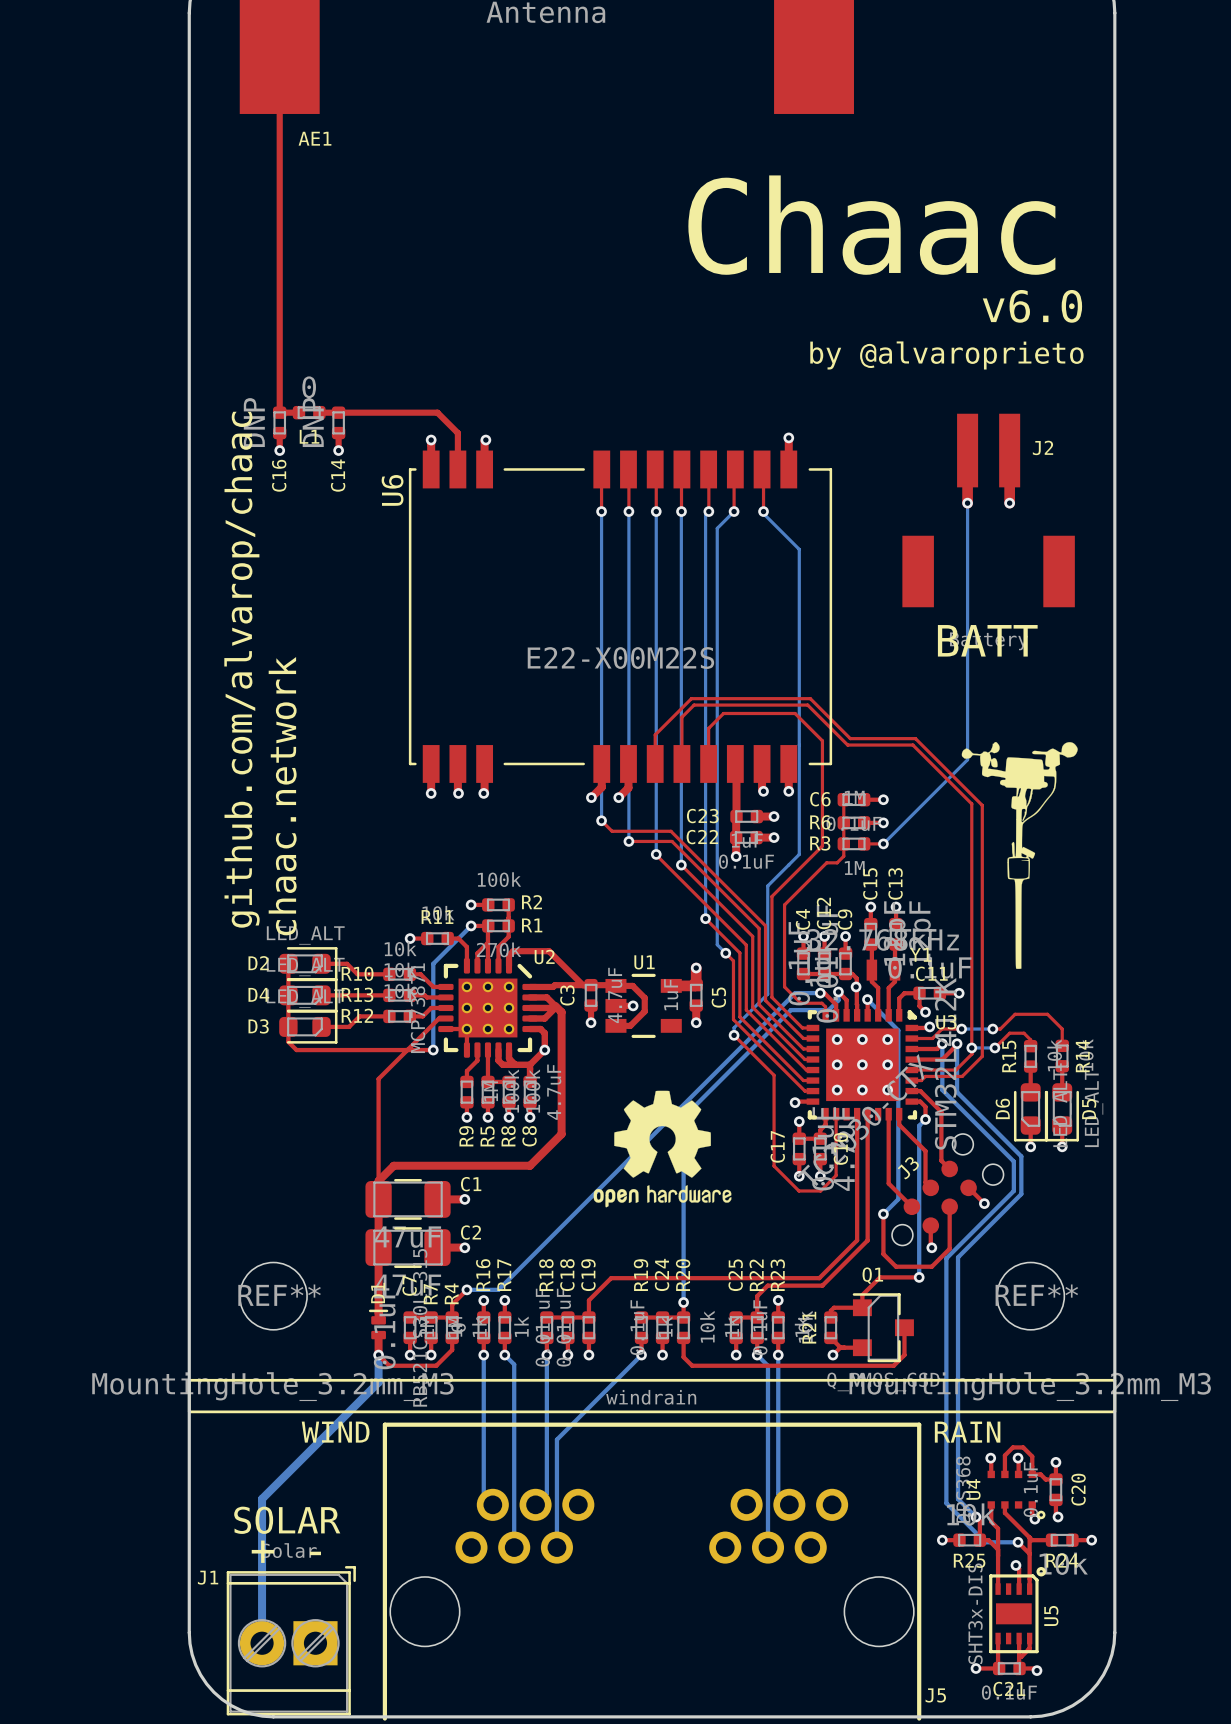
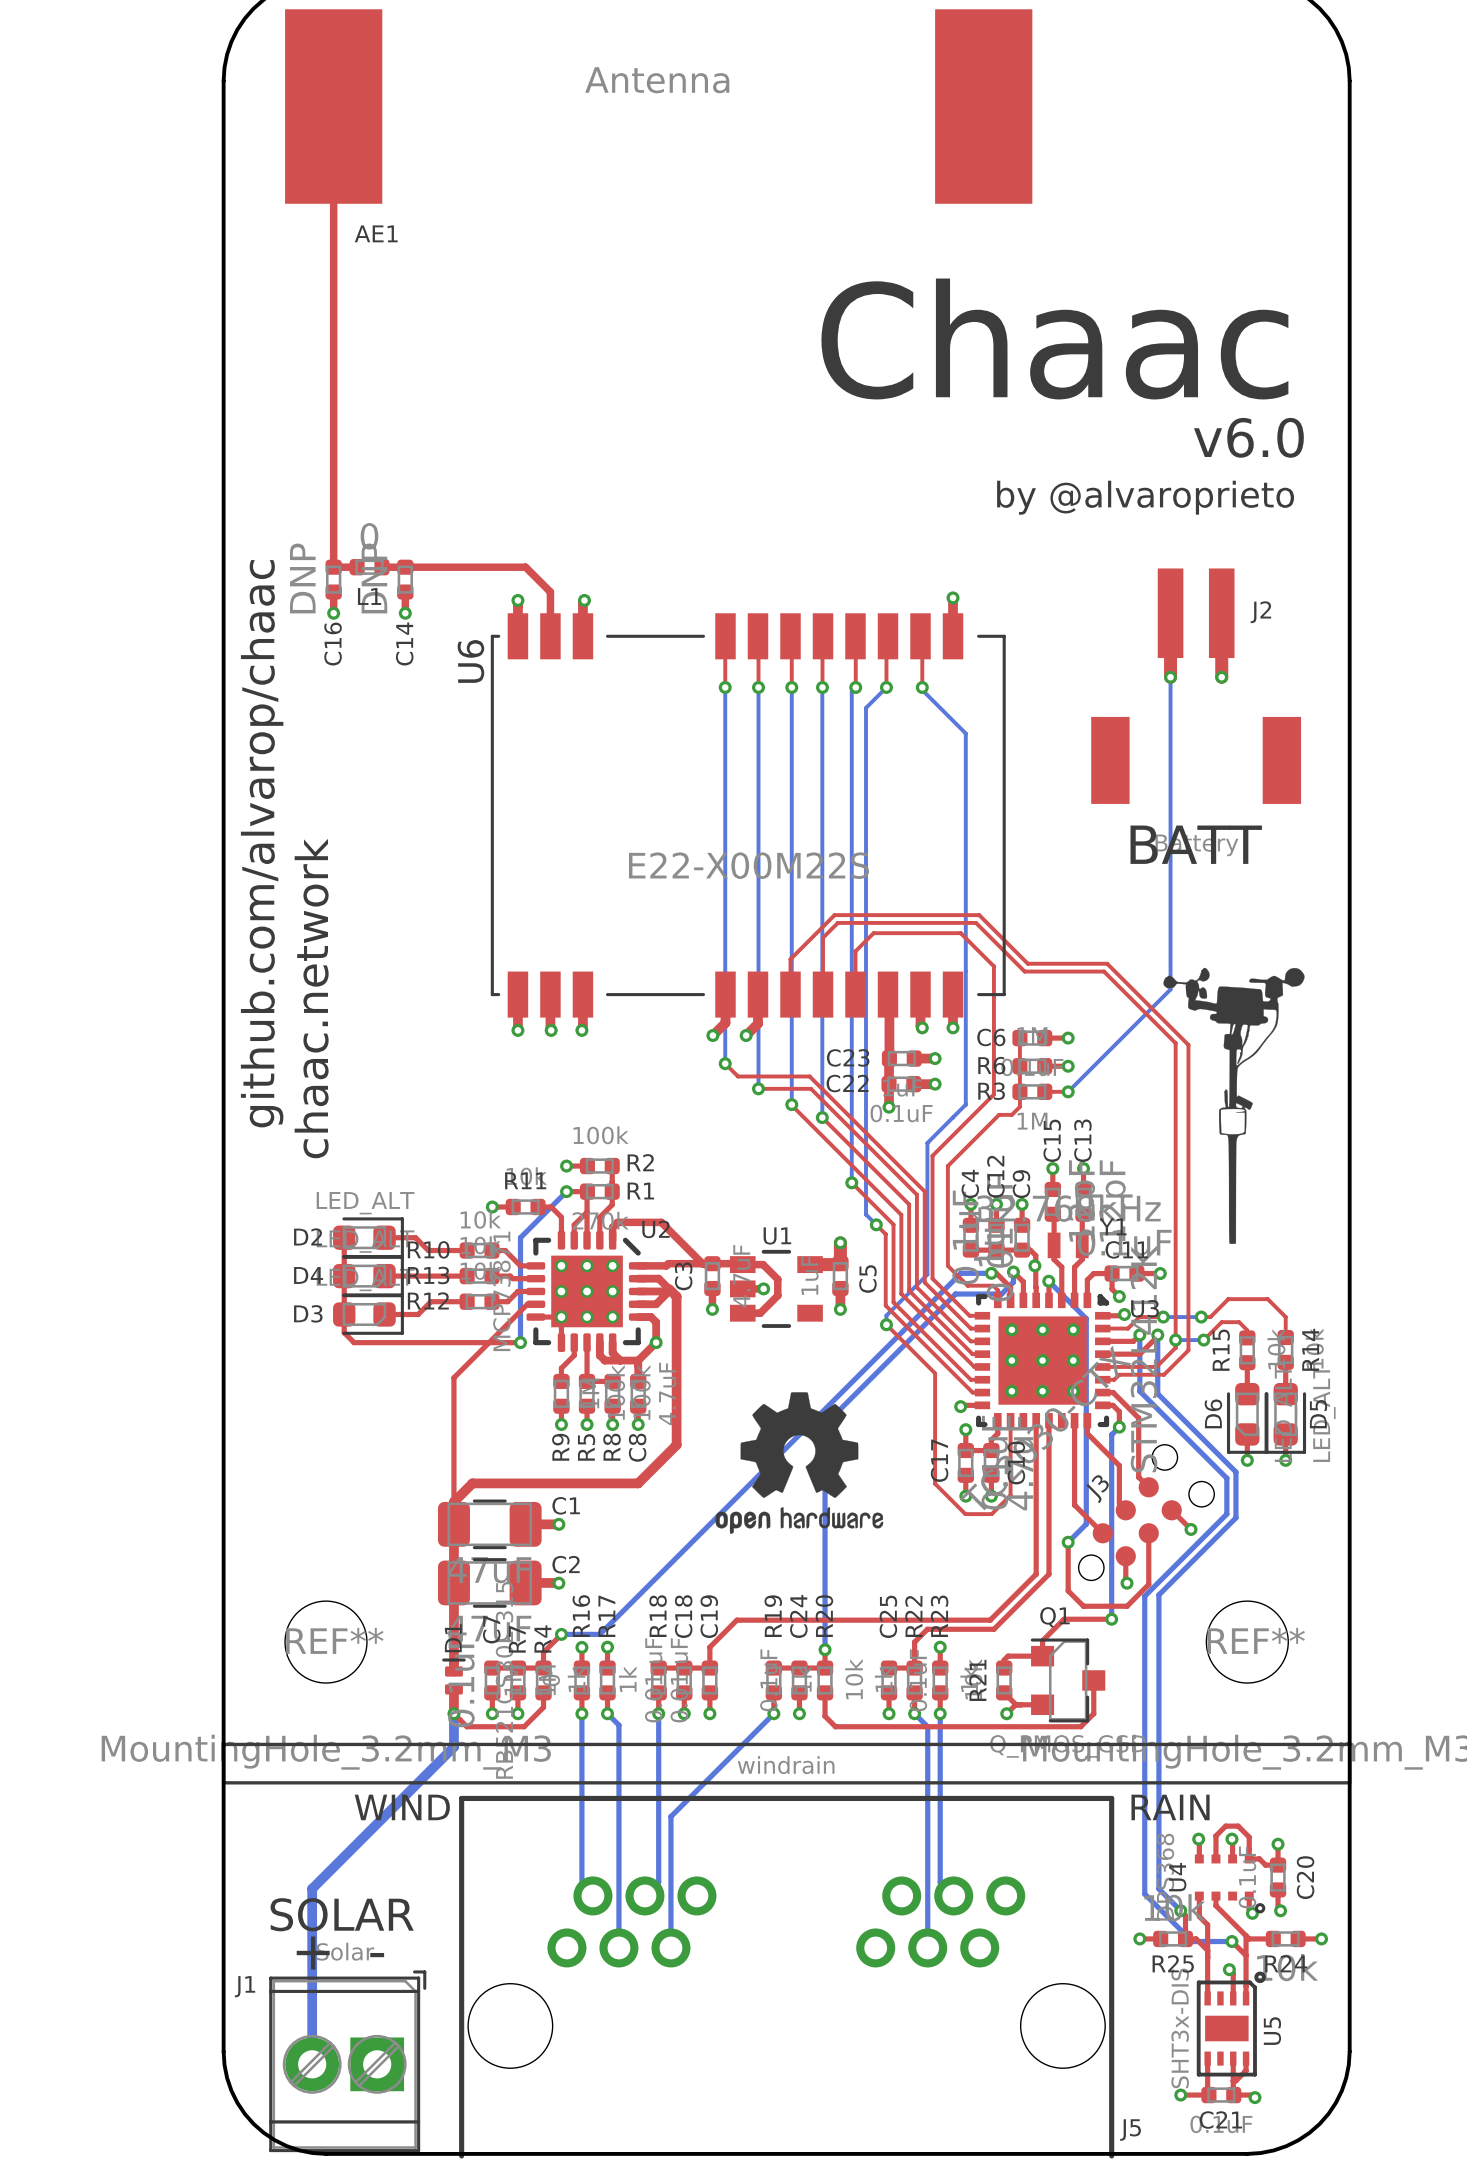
text position: github.com/alvarop/chaac (241, 669) -> github.com/alvarop/chaac (262, 843)
text position: chaac.network (282, 796) -> chaac.network (311, 998)

